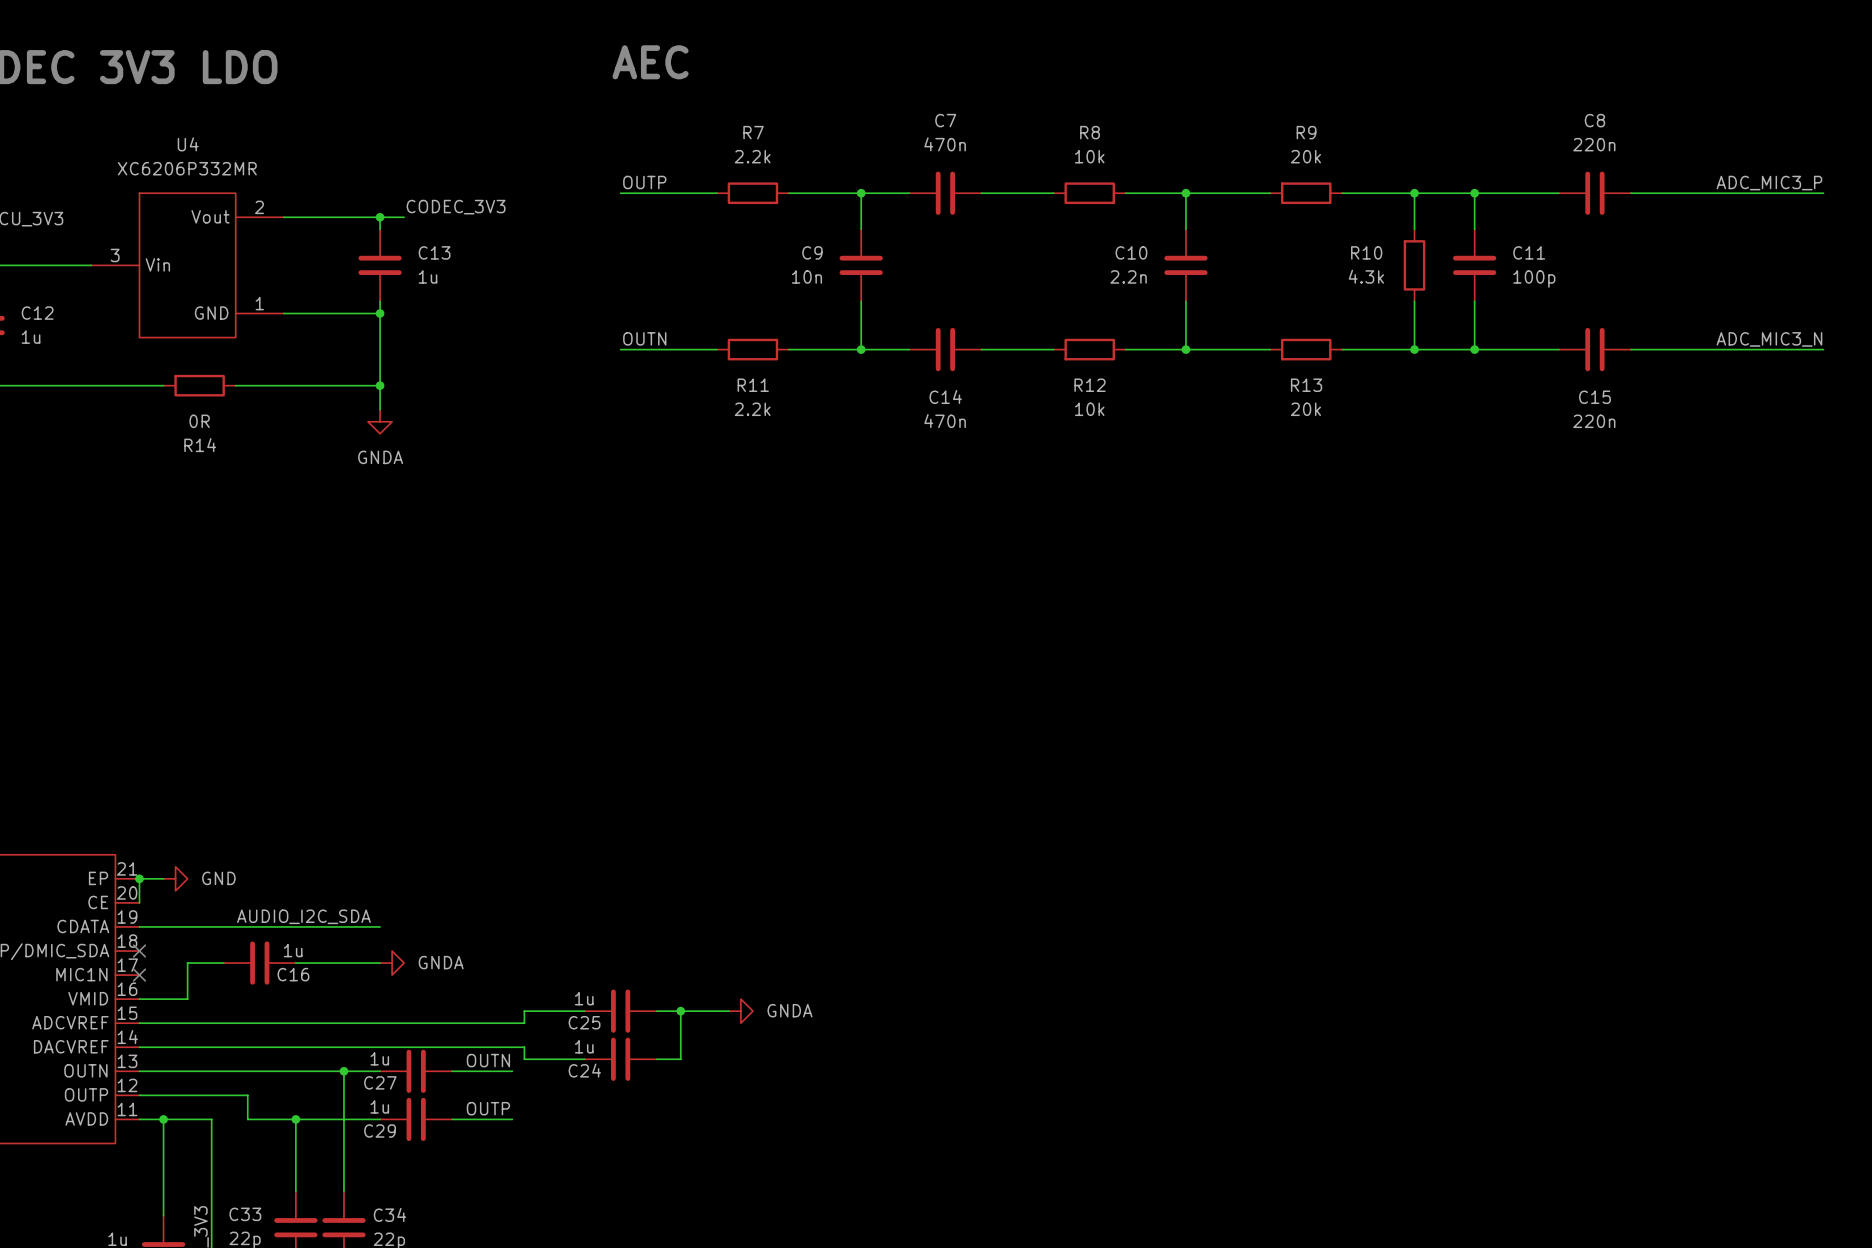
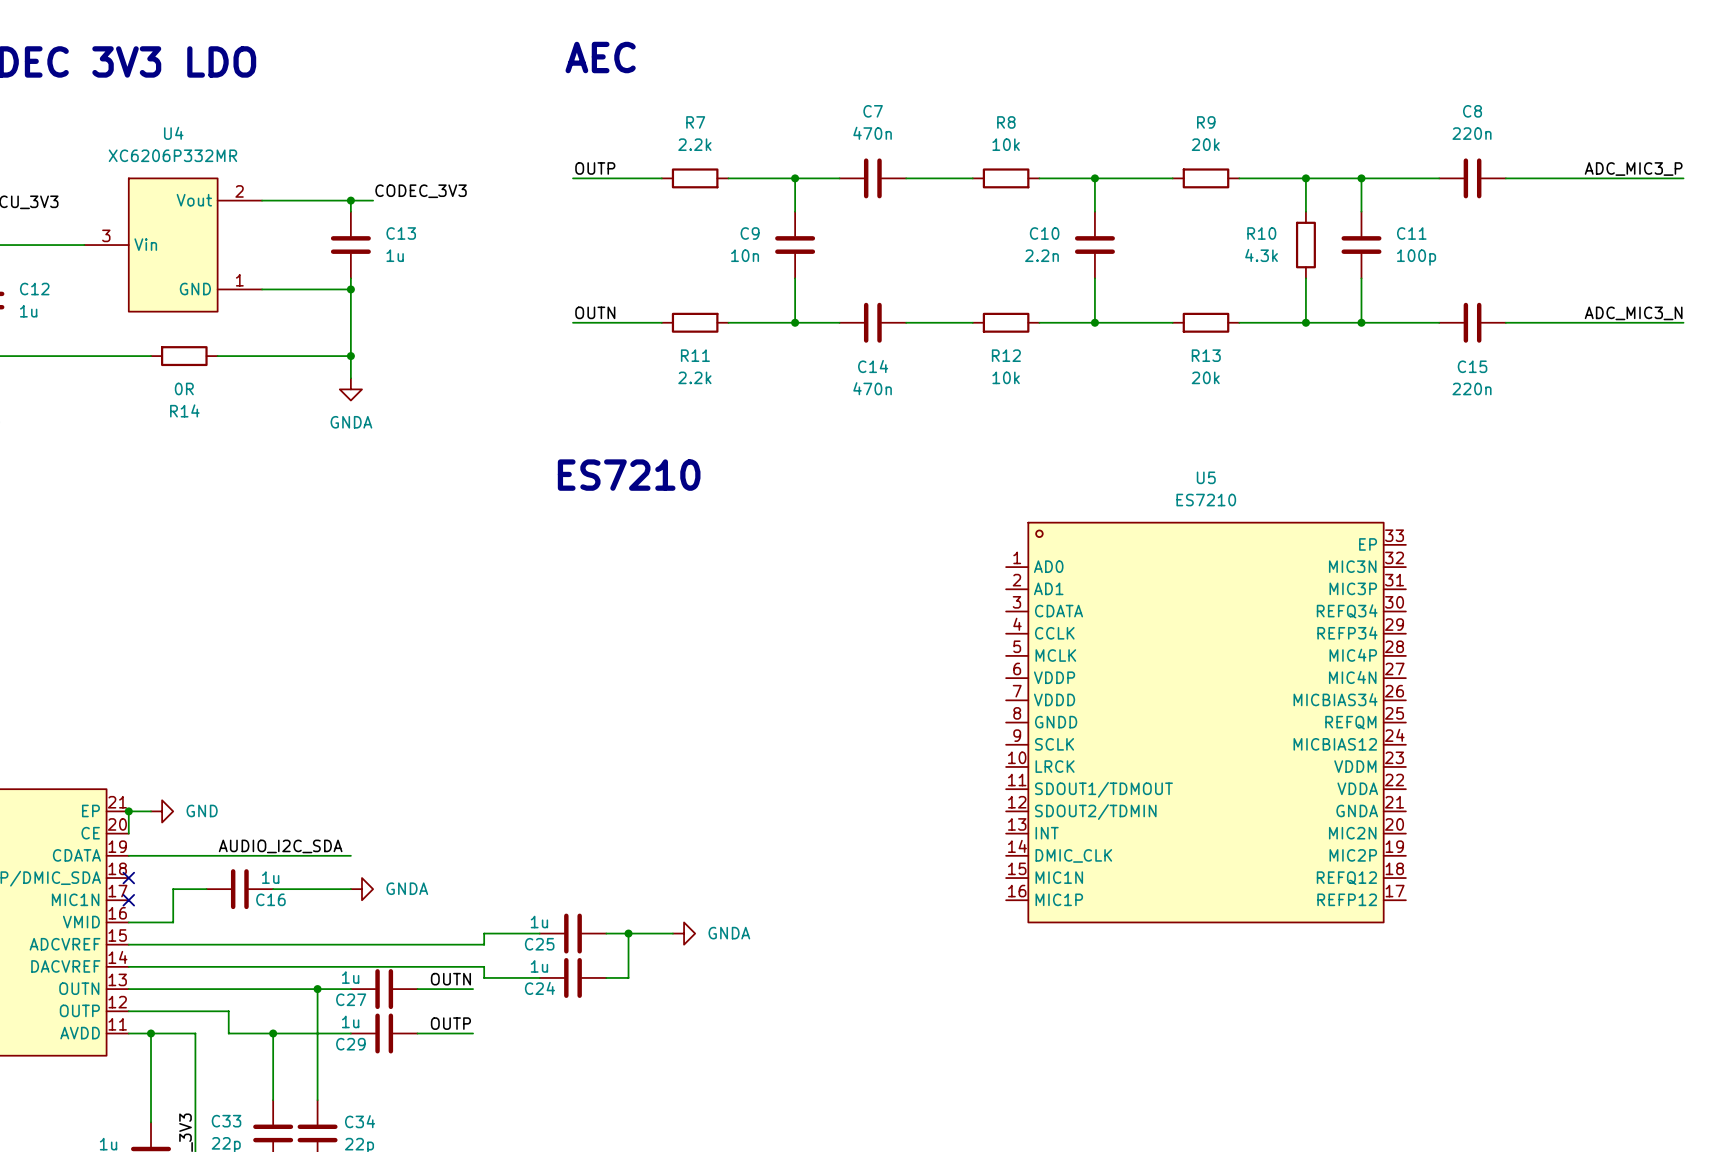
text: none -> ES7210 (629, 475)
U5: none -> ES7210 (1206, 722)

